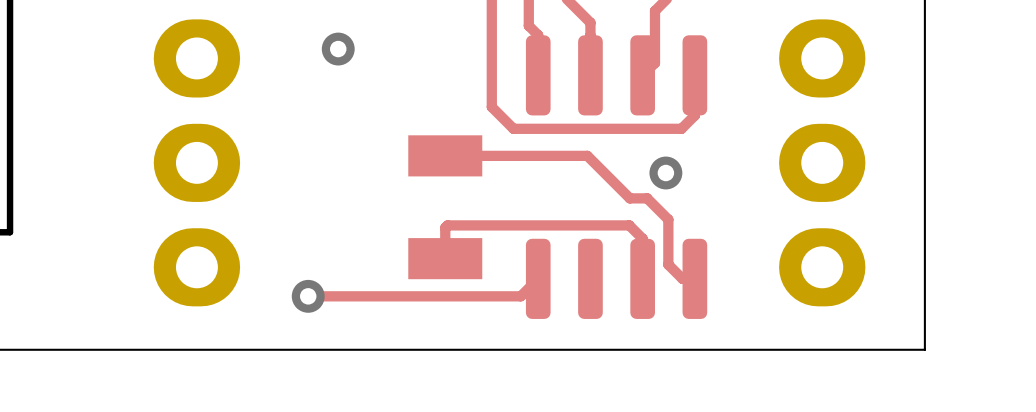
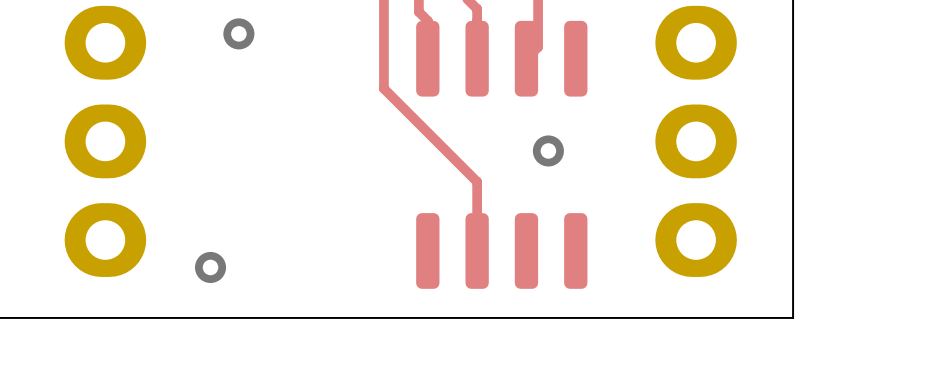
top track: (694, 75) (694, 115) (681, 128) (513, 128) -> (477, 250) (477, 181) (404, 109)
top track: (445, 155) (587, 155) (629, 198) (647, 198) (668, 219) (668, 264) (682, 278) (694, 278) -> none
part: (445, 207) -> none
top track: (445, 258) (445, 227) (447, 225) (629, 225) (642, 238) (642, 278) -> none
top track: (538, 278) (520, 296) (308, 296) -> none

